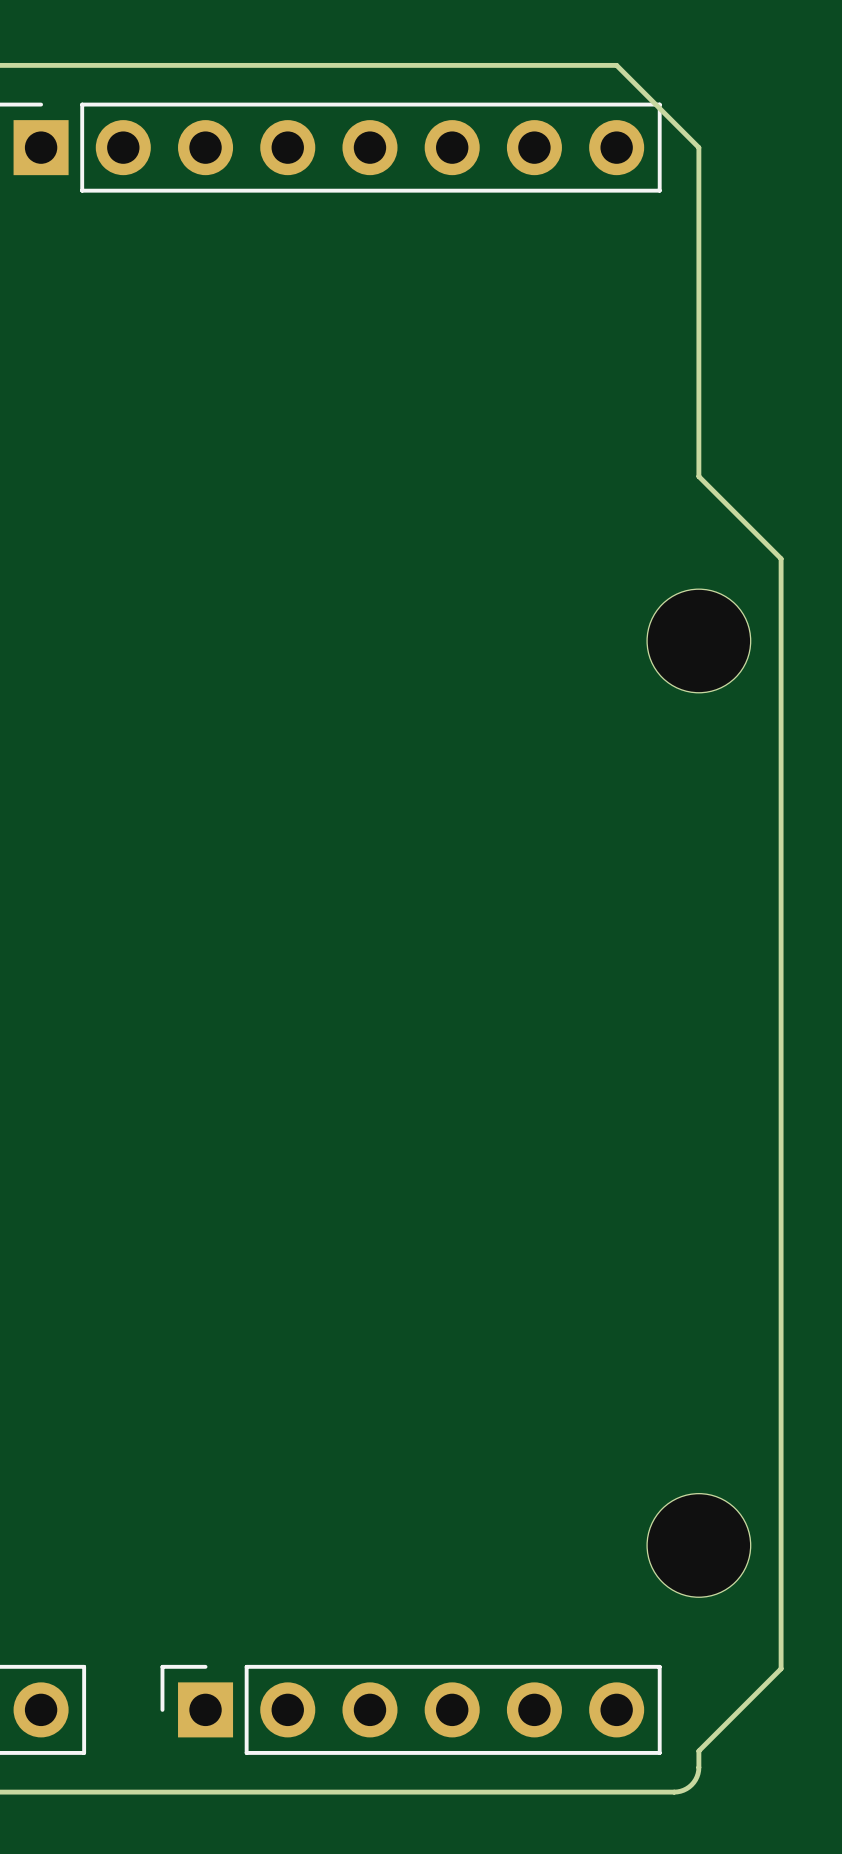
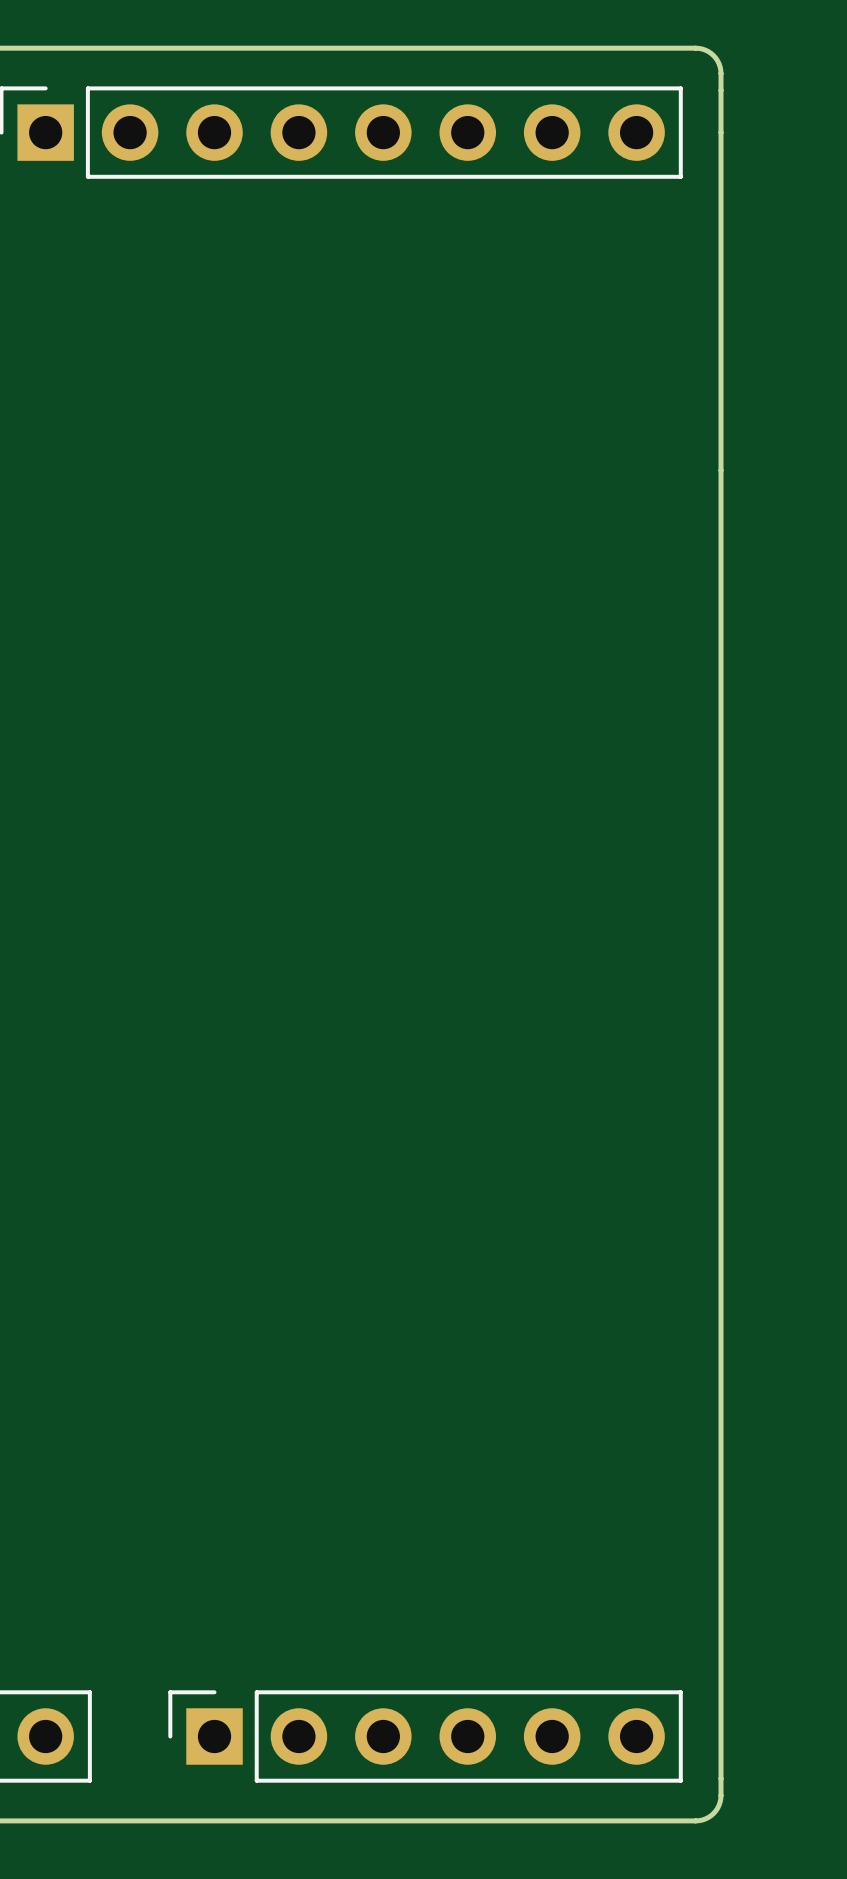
board edge: (616, 65) (698, 147) -> (636, 48) (698, 48) (713, 55) (720, 70) (721, 132)
board edge: (698, 476) (781, 558) (781, 1668) (698, 1751) -> (721, 470) (721, 1778)
part: (698, 640) -> none
part: (698, 1545) -> none

